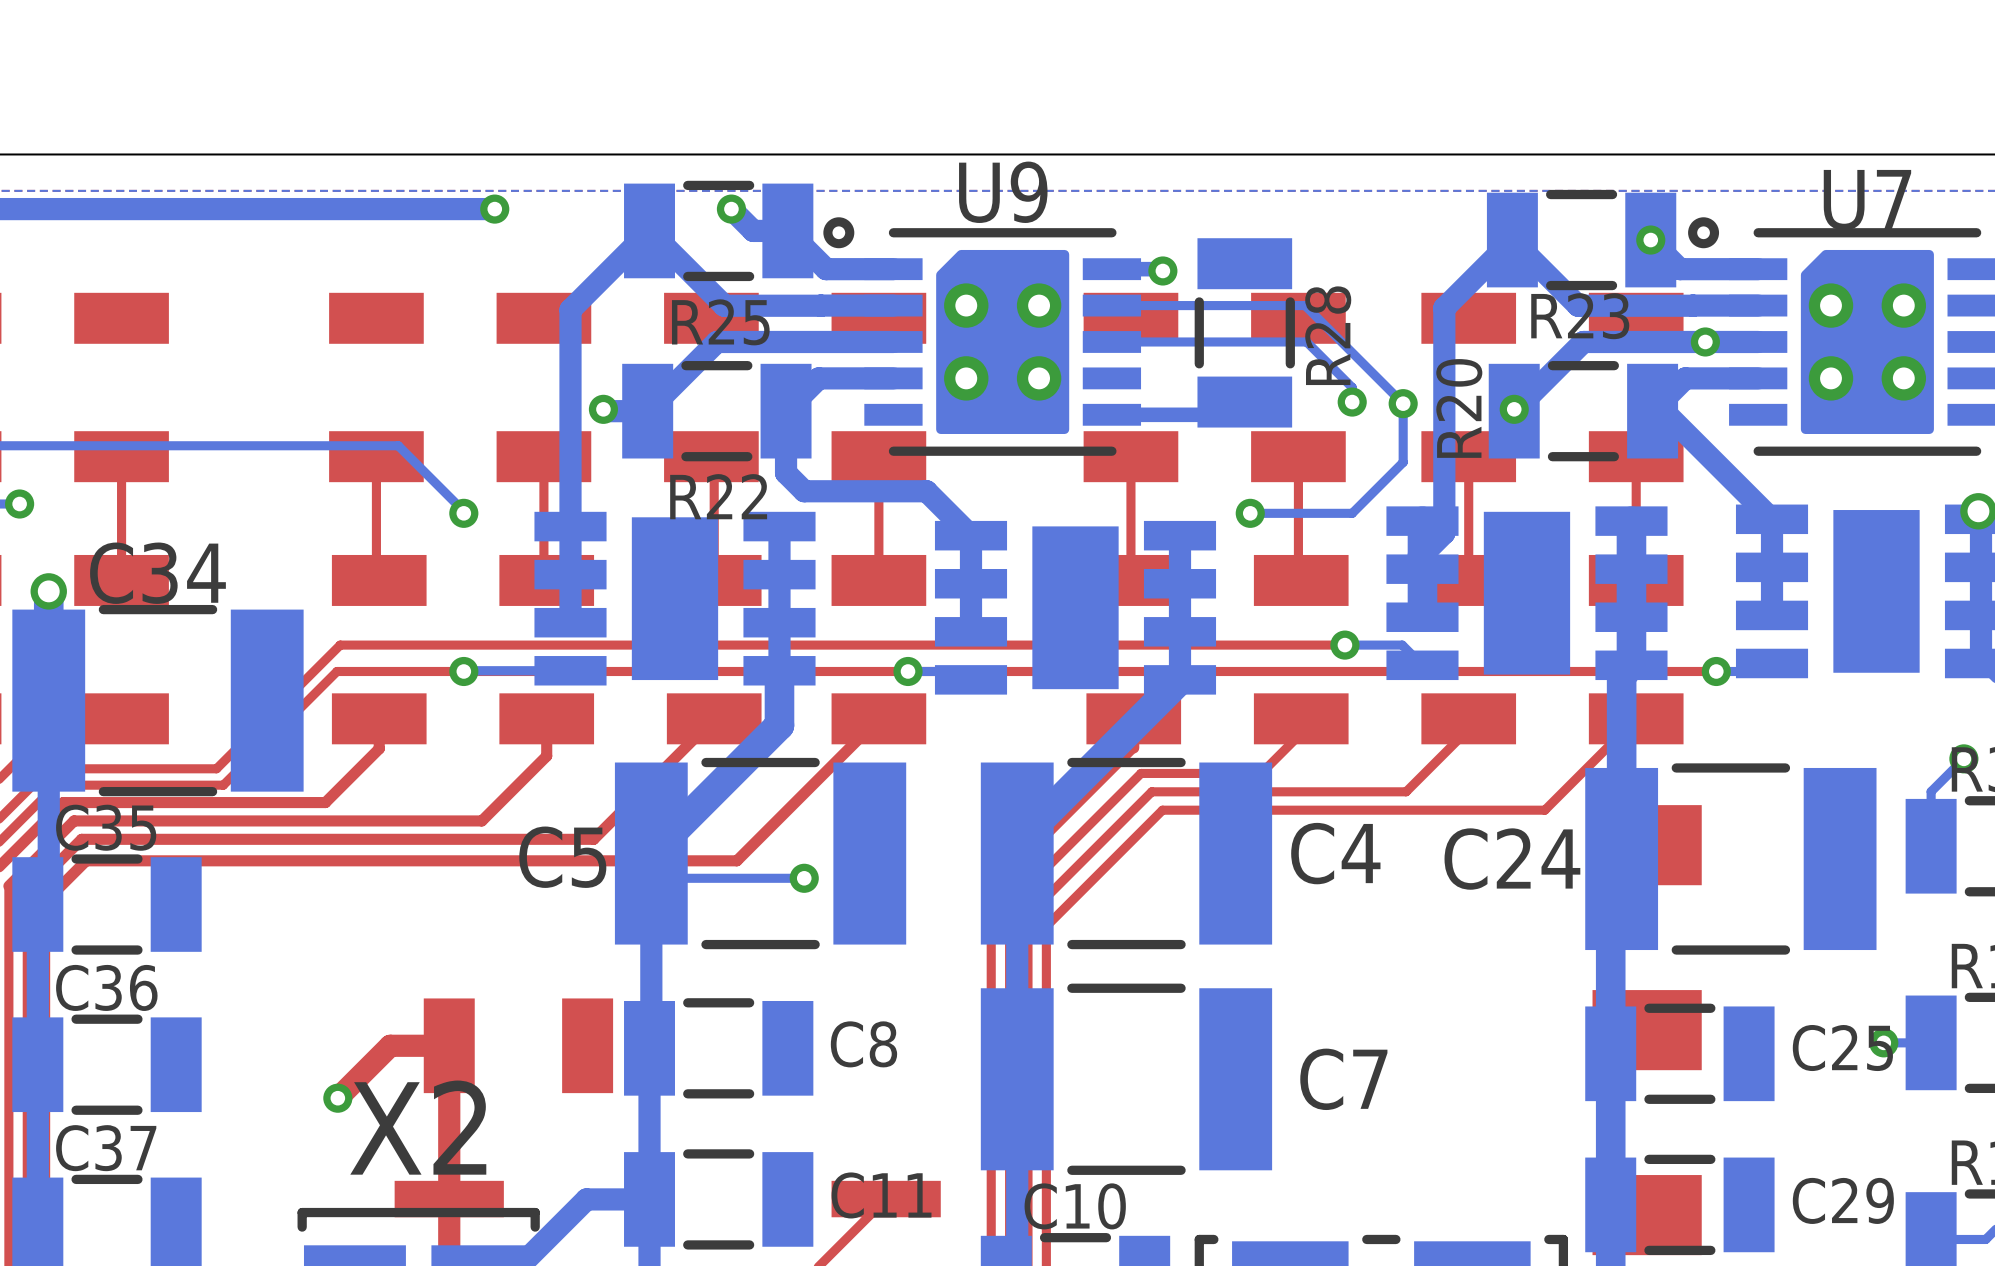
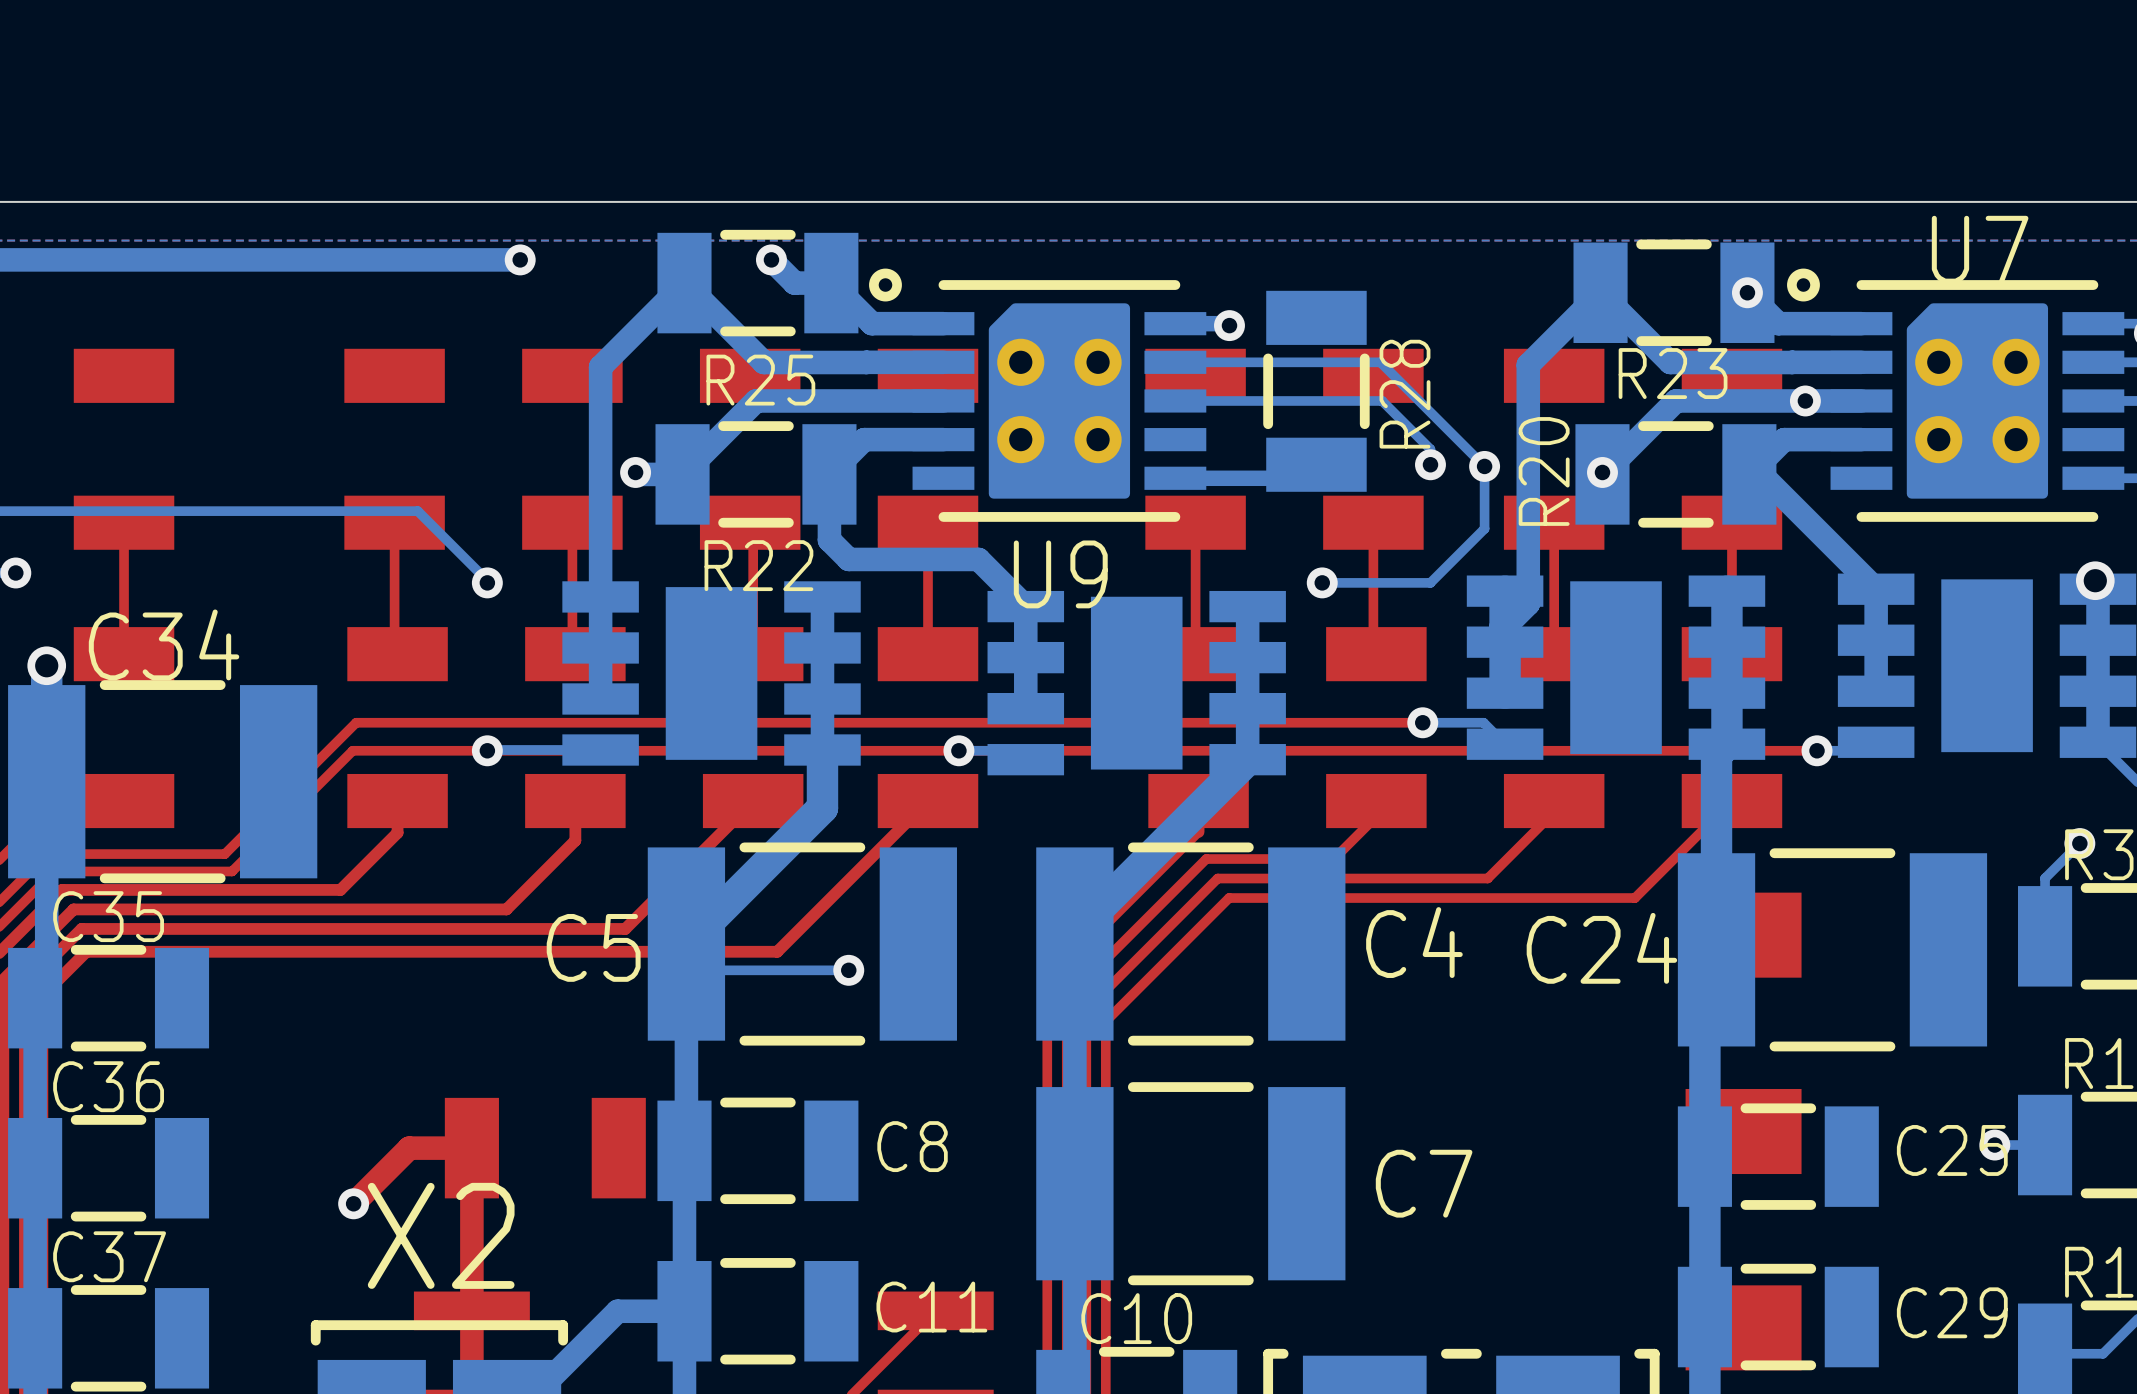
U9 name position: U9 (1003, 192) -> U9 (1060, 574)

